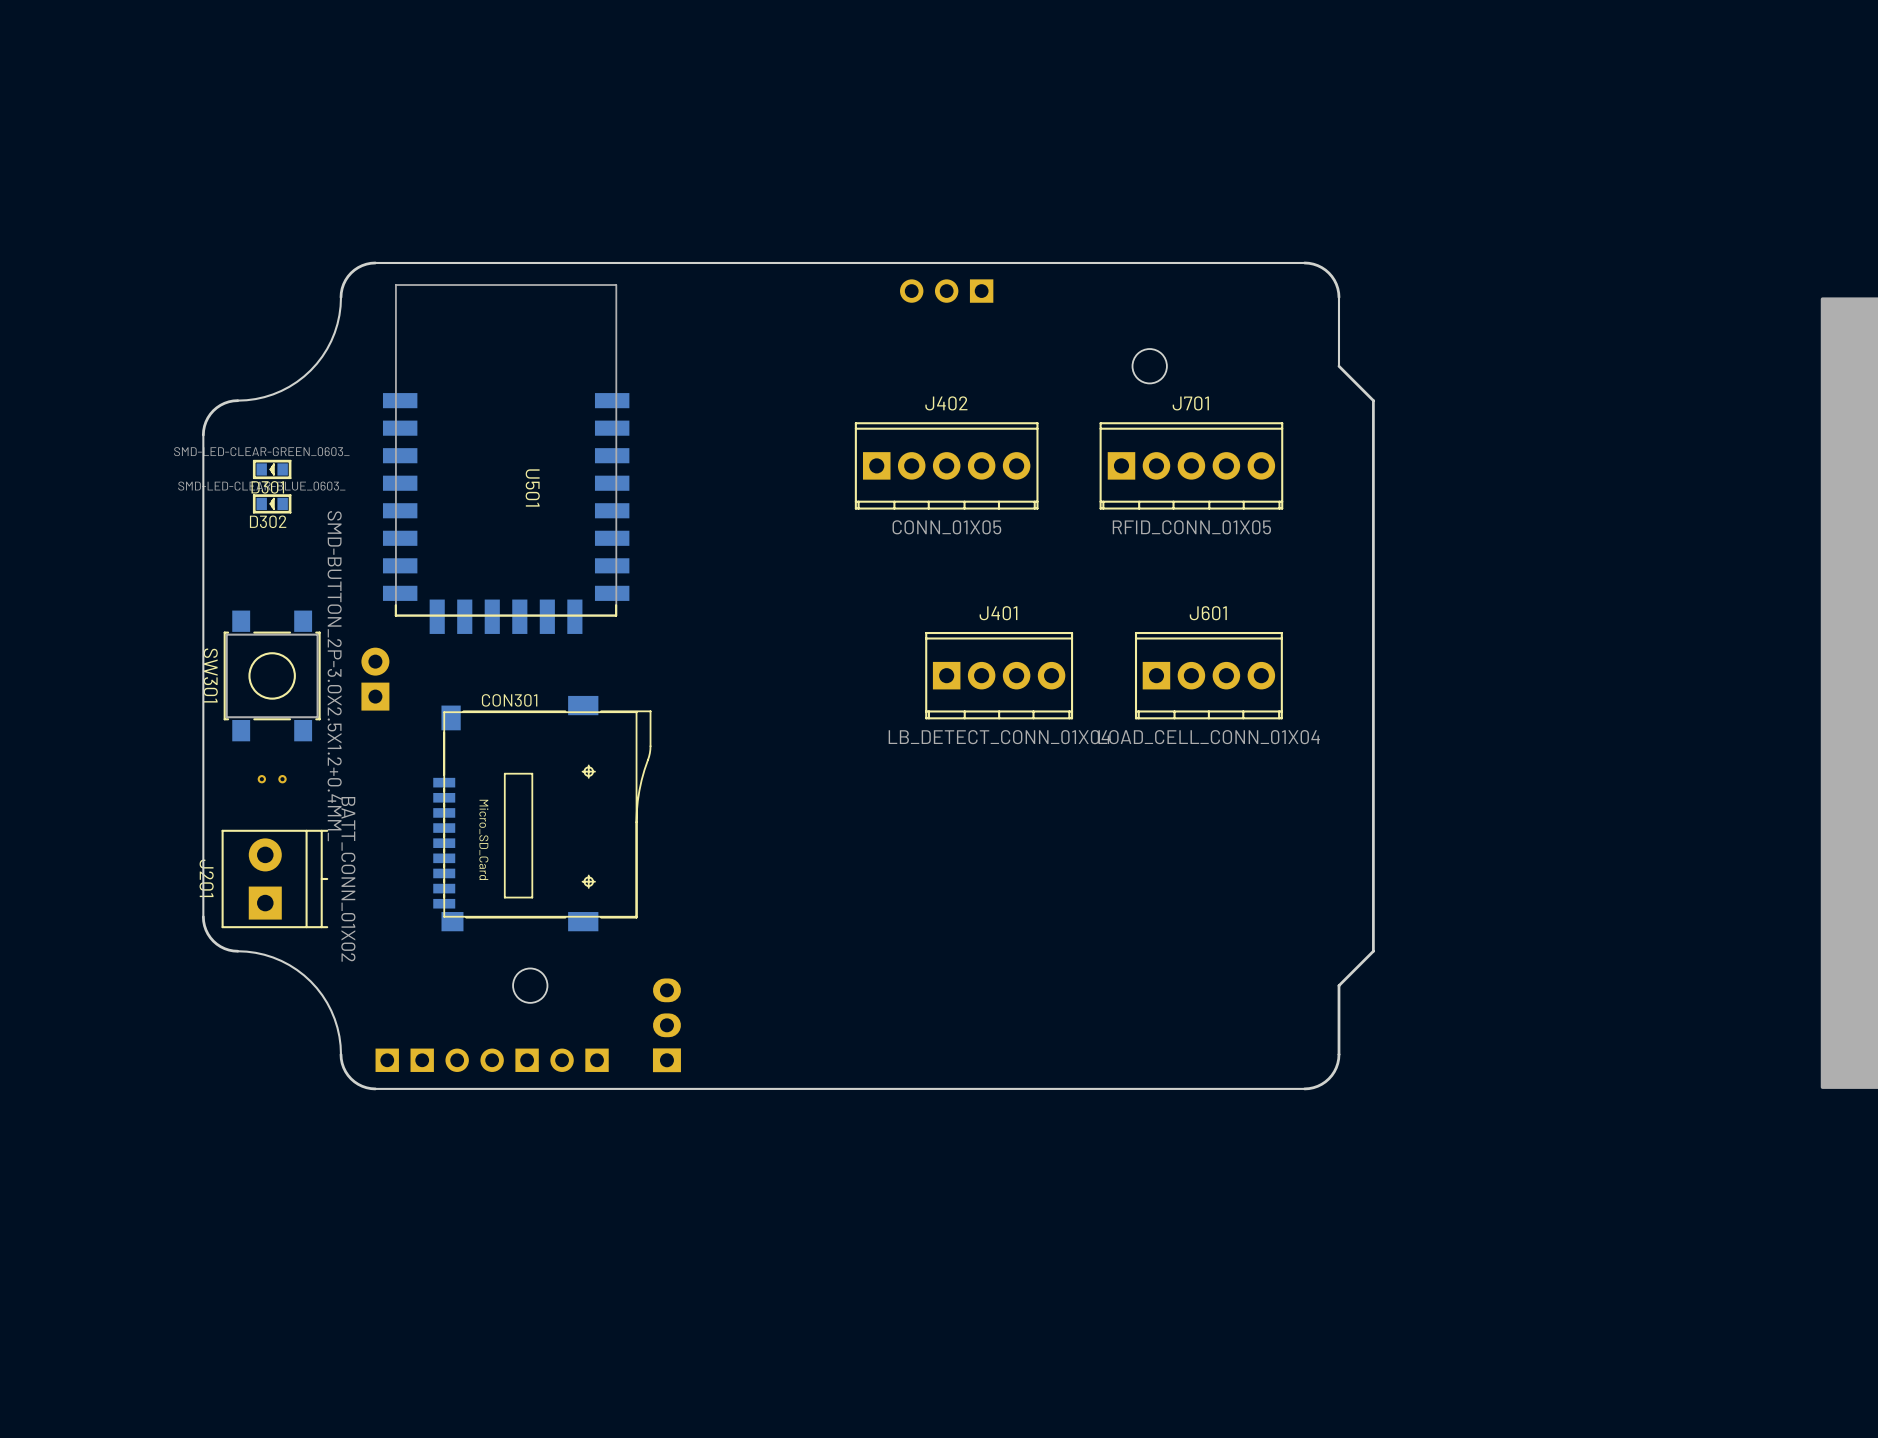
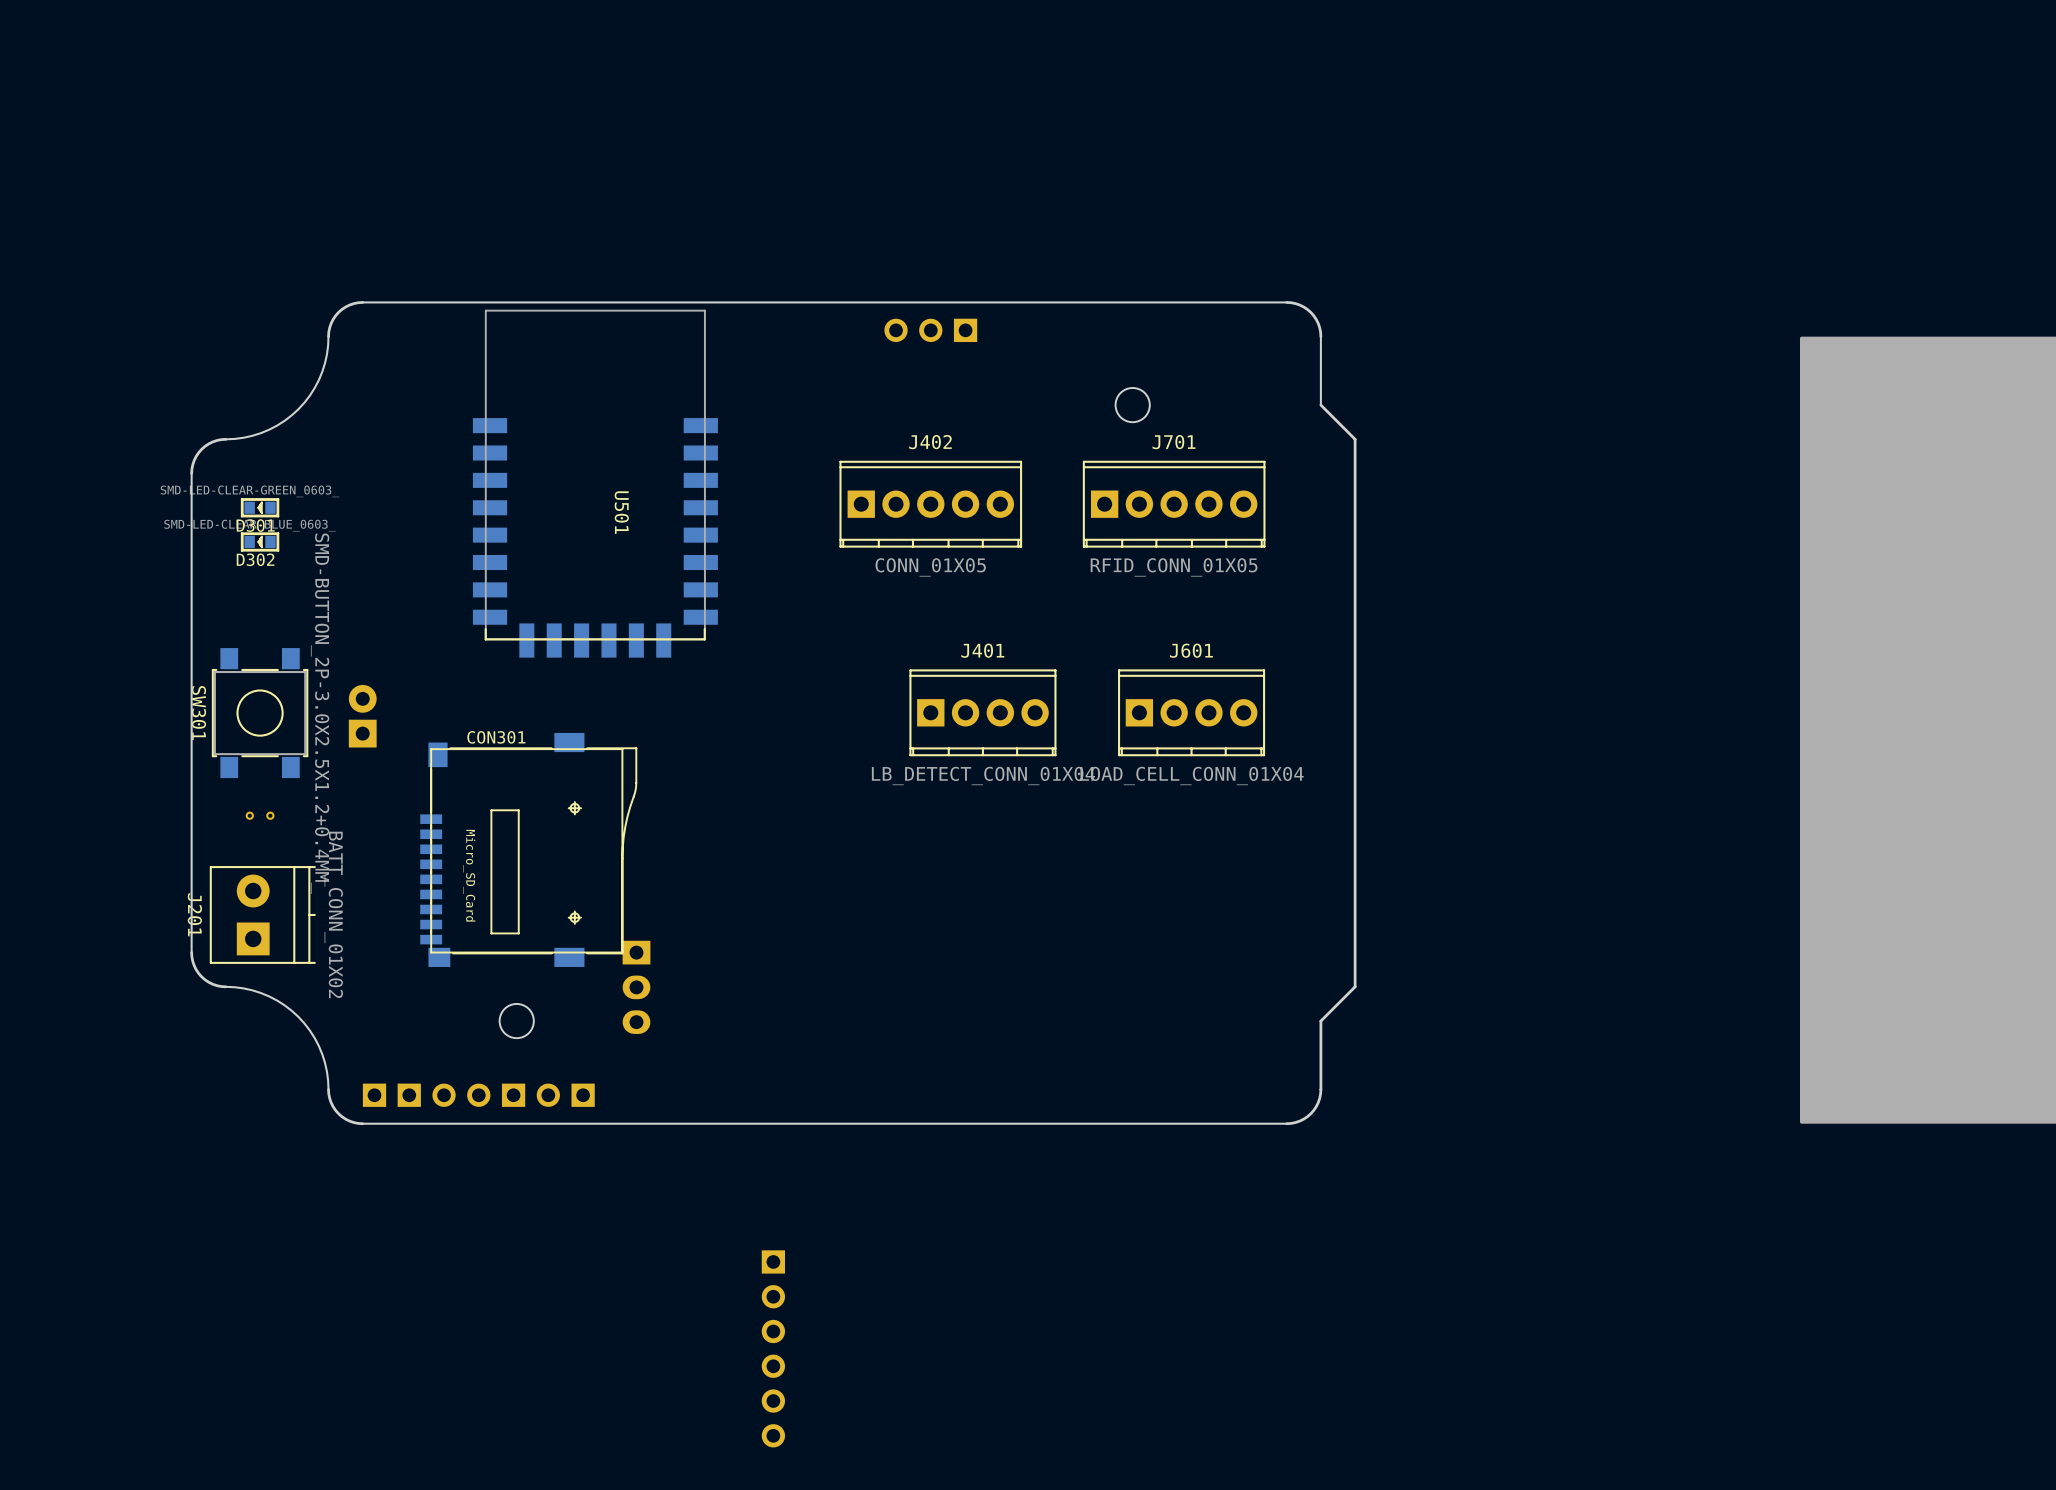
U501 position: (506, 459) -> (595, 483)
part rotation: 0° (666, 1025) -> 180° (636, 987)
part position: (666, 1025) -> (636, 987)
part: none -> (773, 1348)

